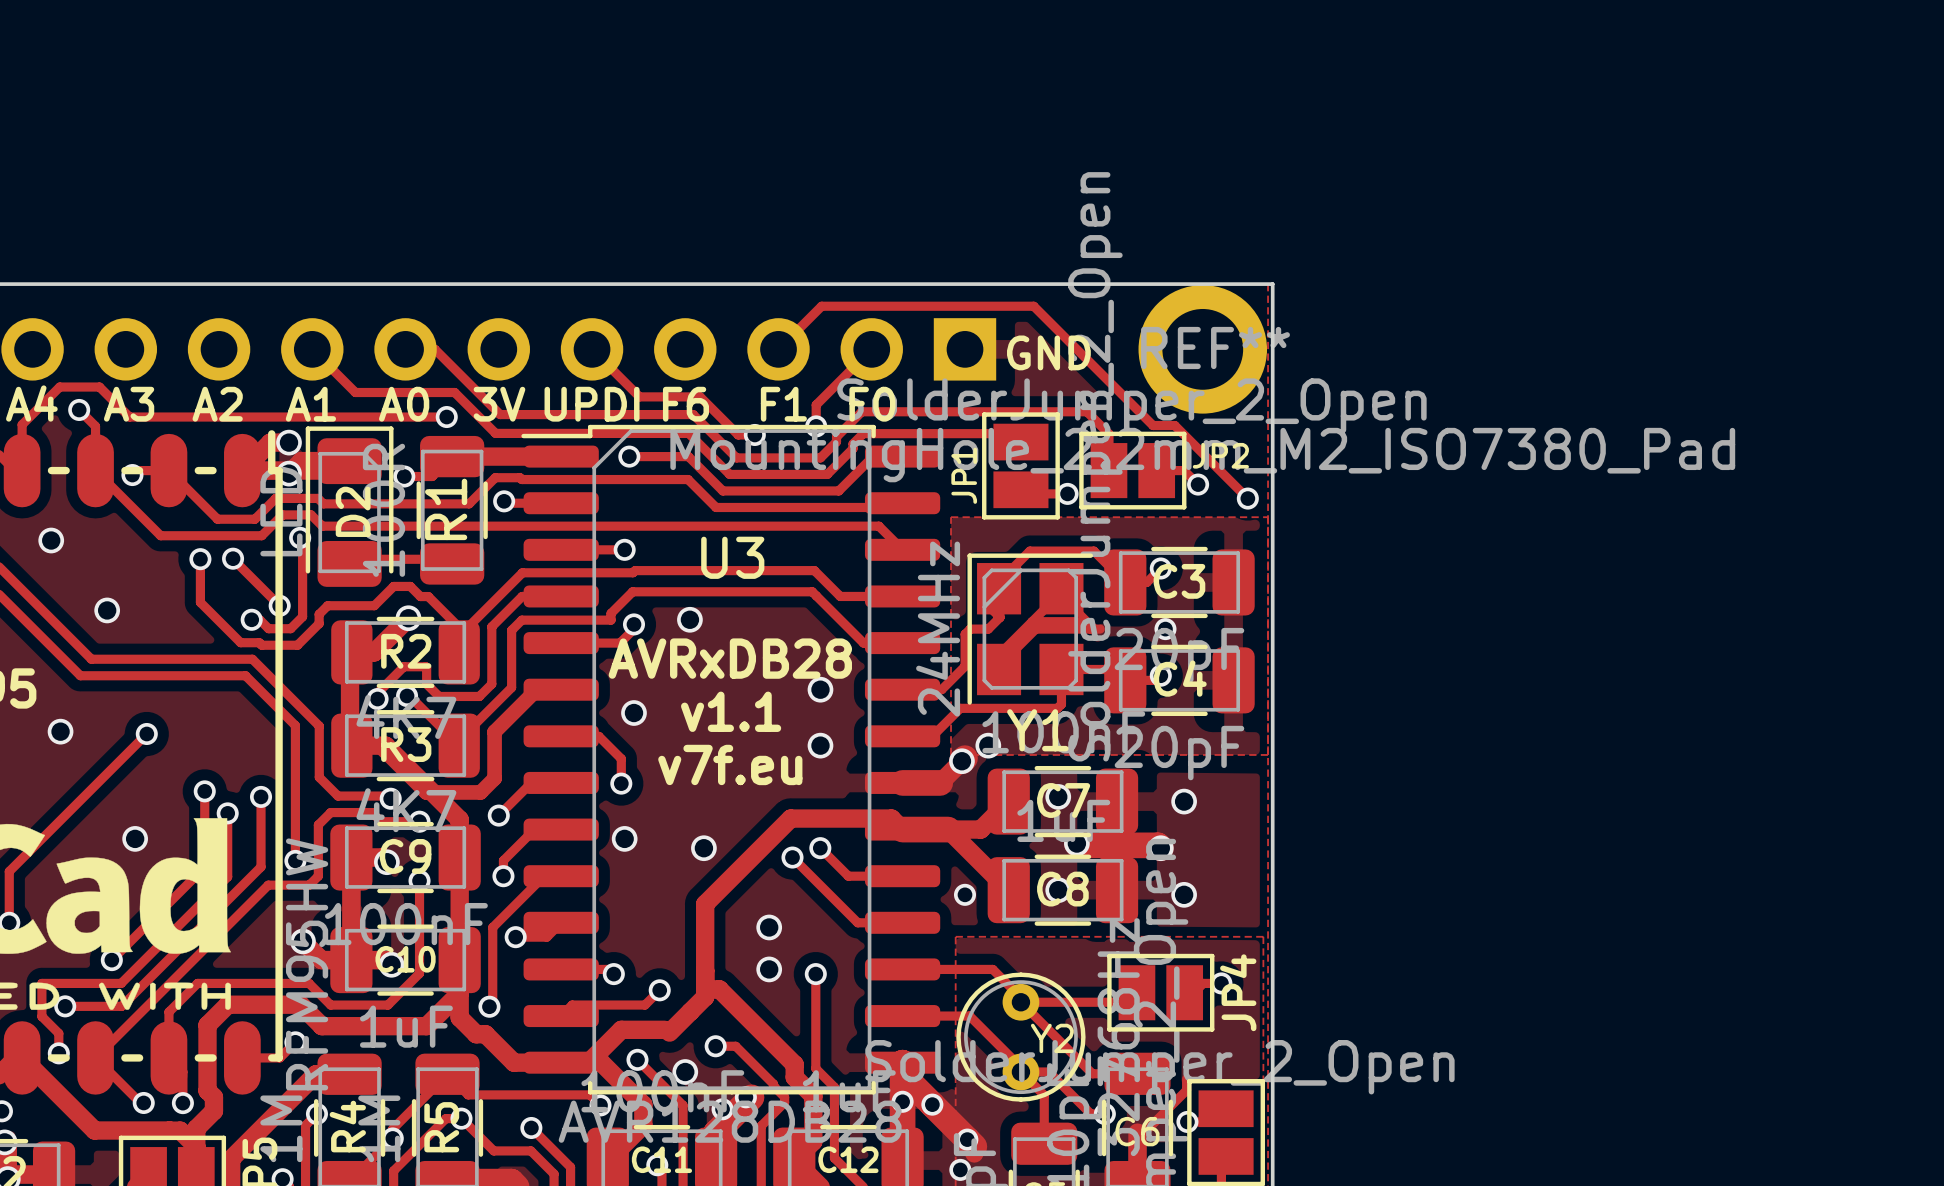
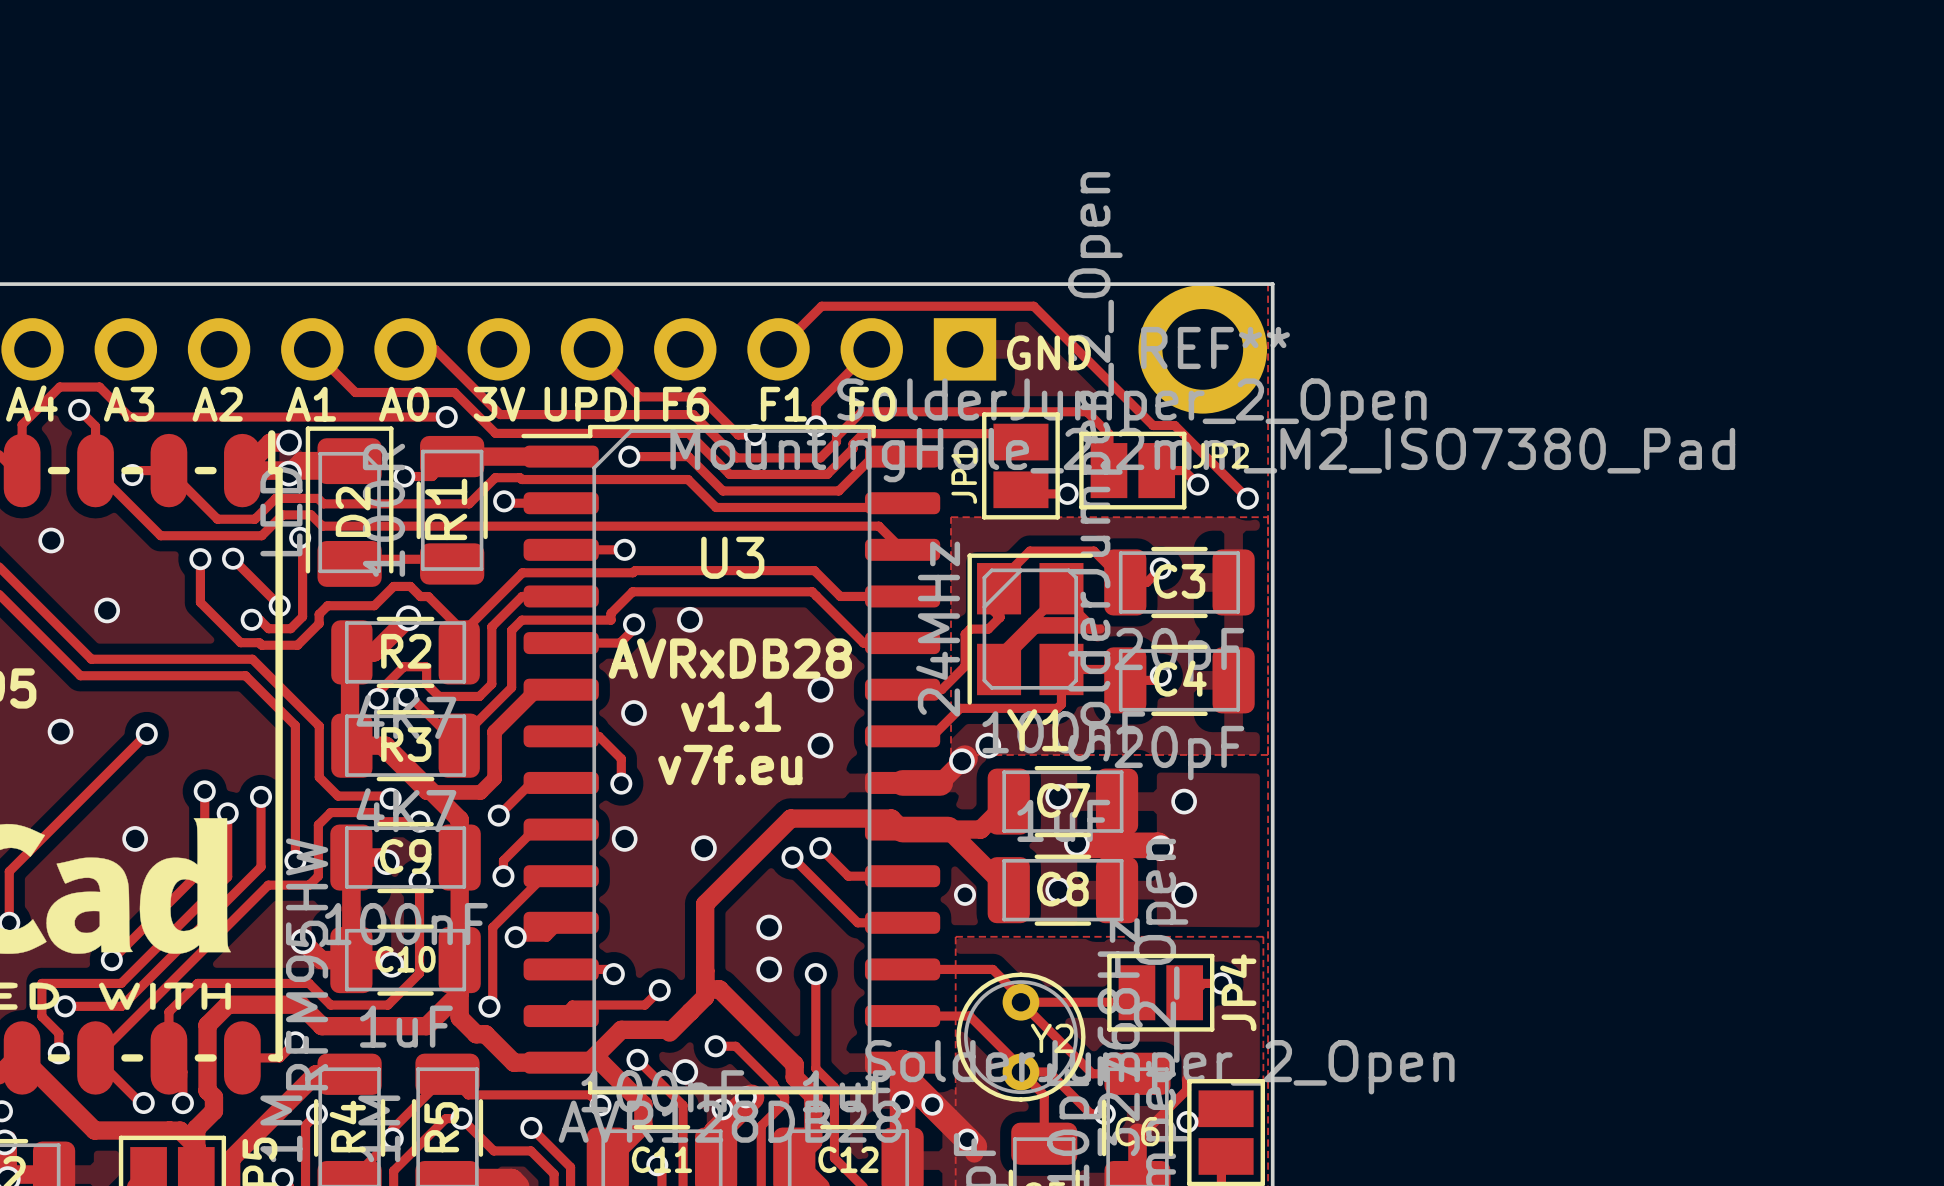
via: (1165, 629) -> none
via: (960, 1169) -> none

